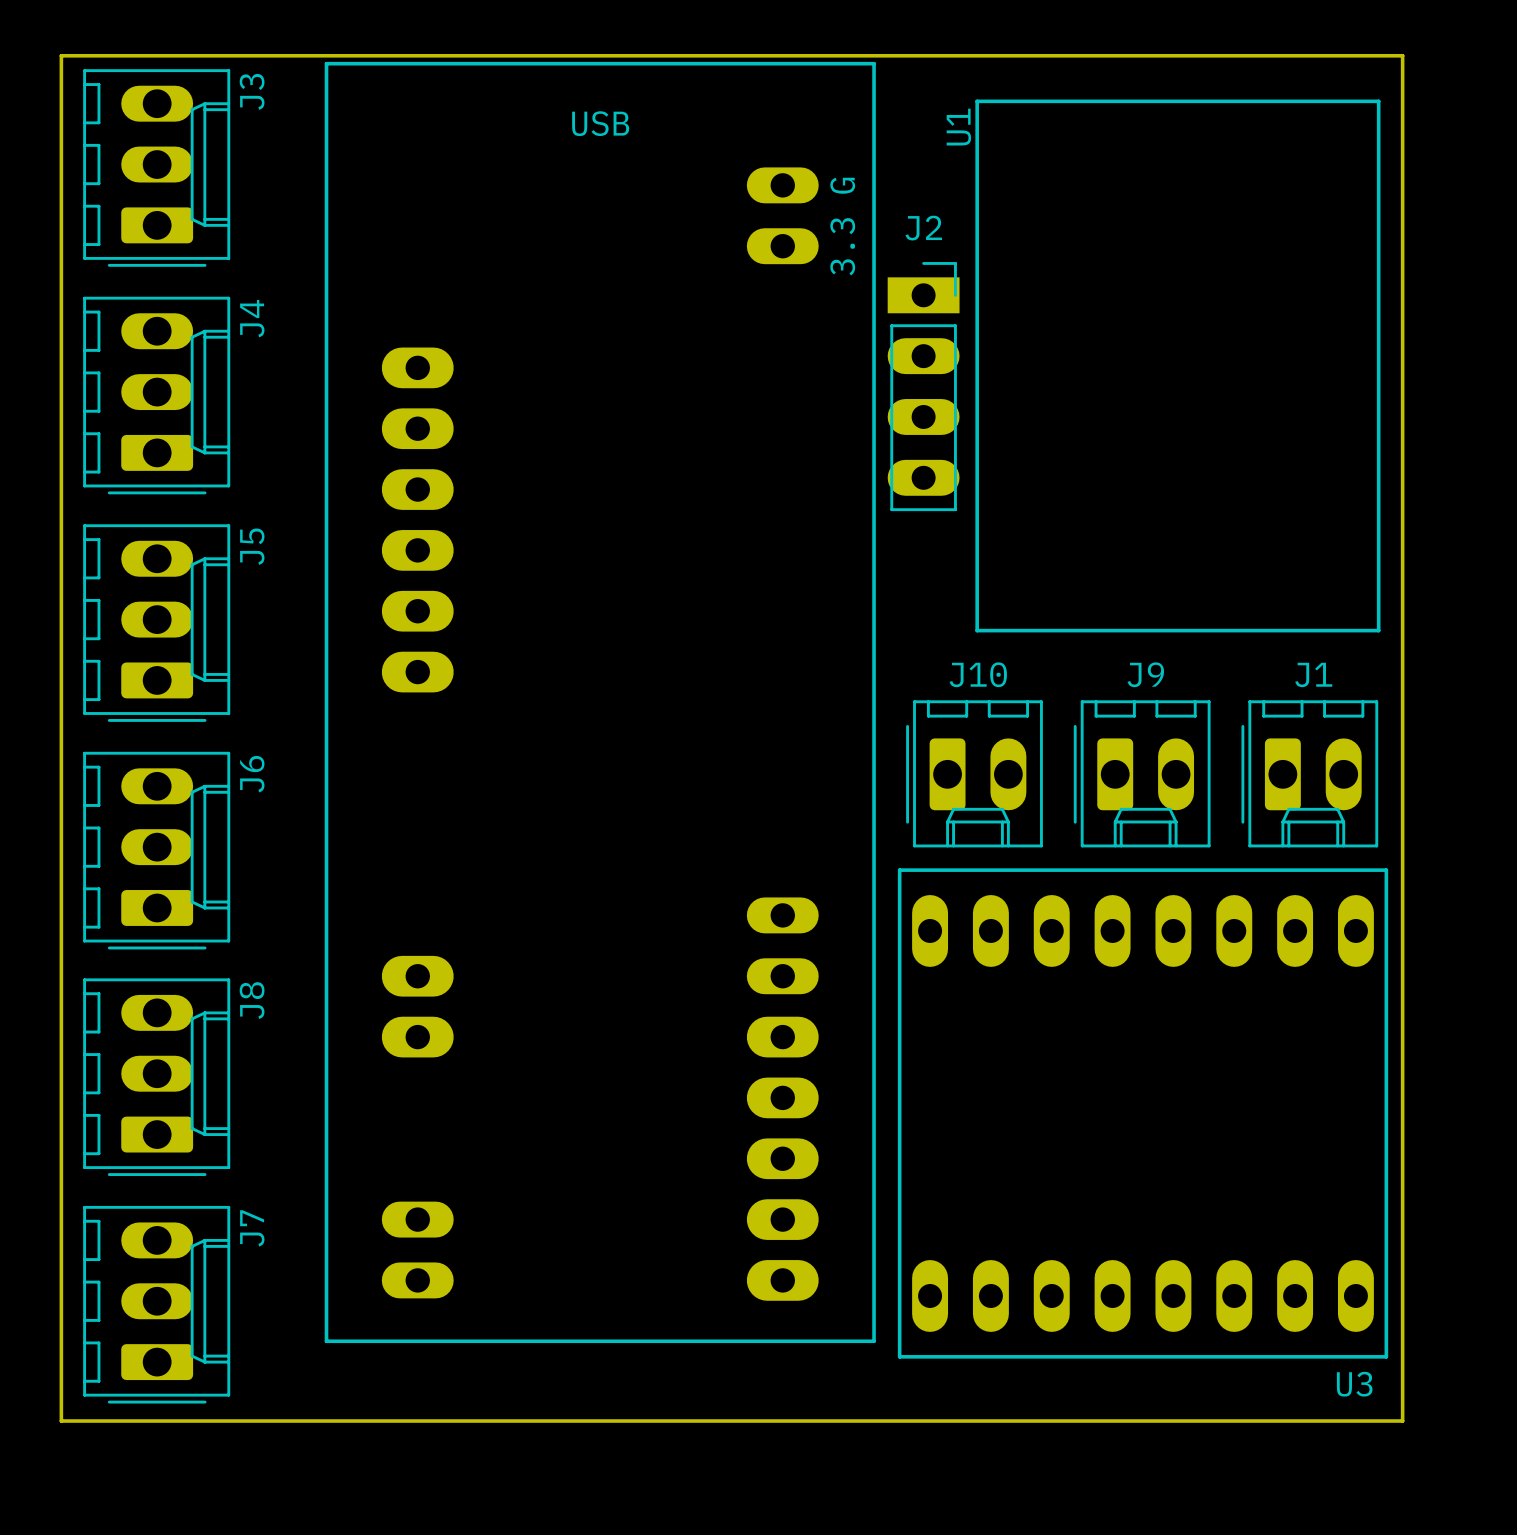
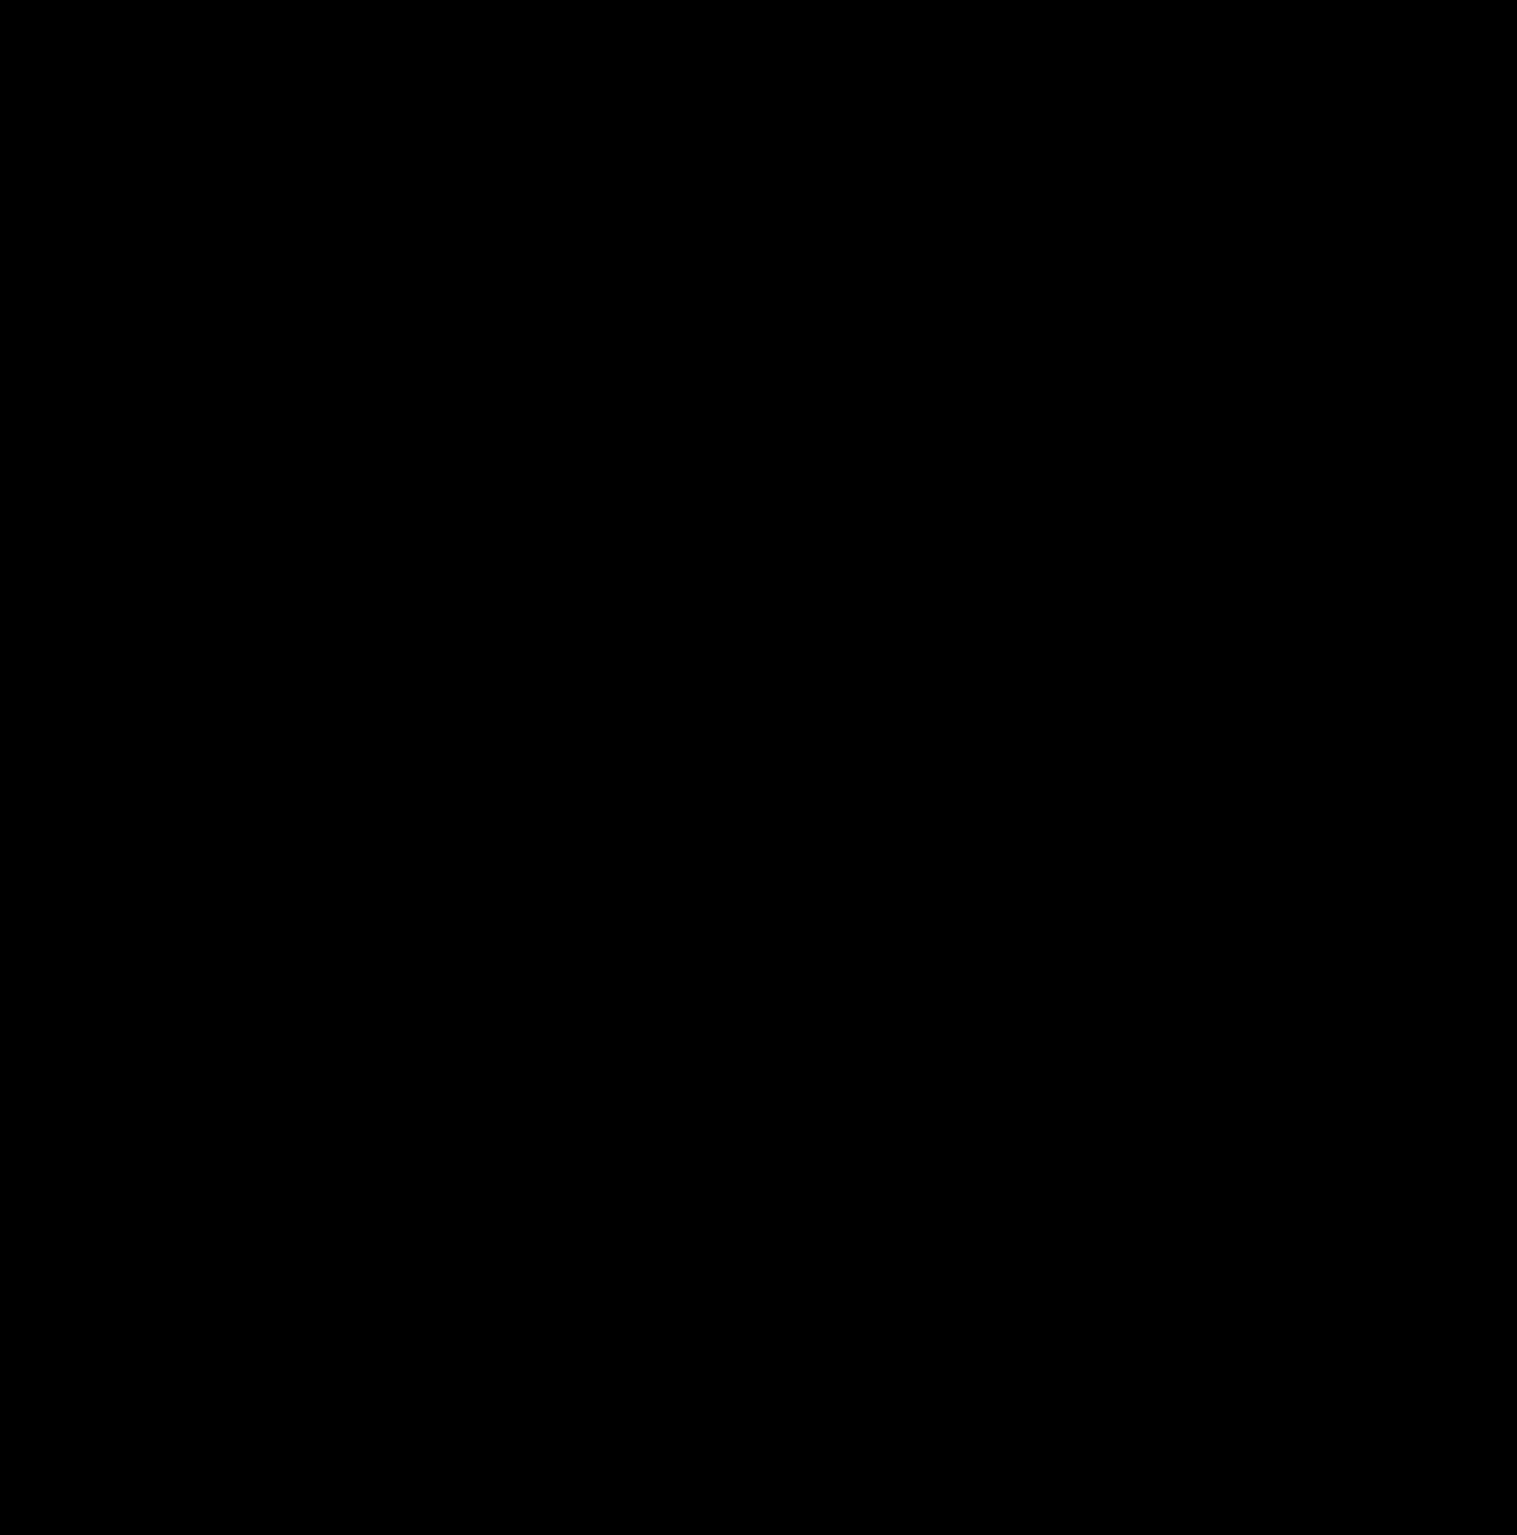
board edge: (61, 55) (61, 1421) (1402, 1421) (1402, 55) (61, 55) -> none
J3: (156, 168) -> none
U1: (1177, 365) -> none
J2: (923, 386) -> none
J4: (156, 395) -> none
J5: (156, 623) -> none
part: (600, 702) -> none
J10: (974, 773) -> none
J9: (1142, 773) -> none
J1: (1309, 773) -> none
J6: (156, 850) -> none
J8: (156, 1077) -> none
U3: (1143, 1113) -> none
J7: (156, 1304) -> none

